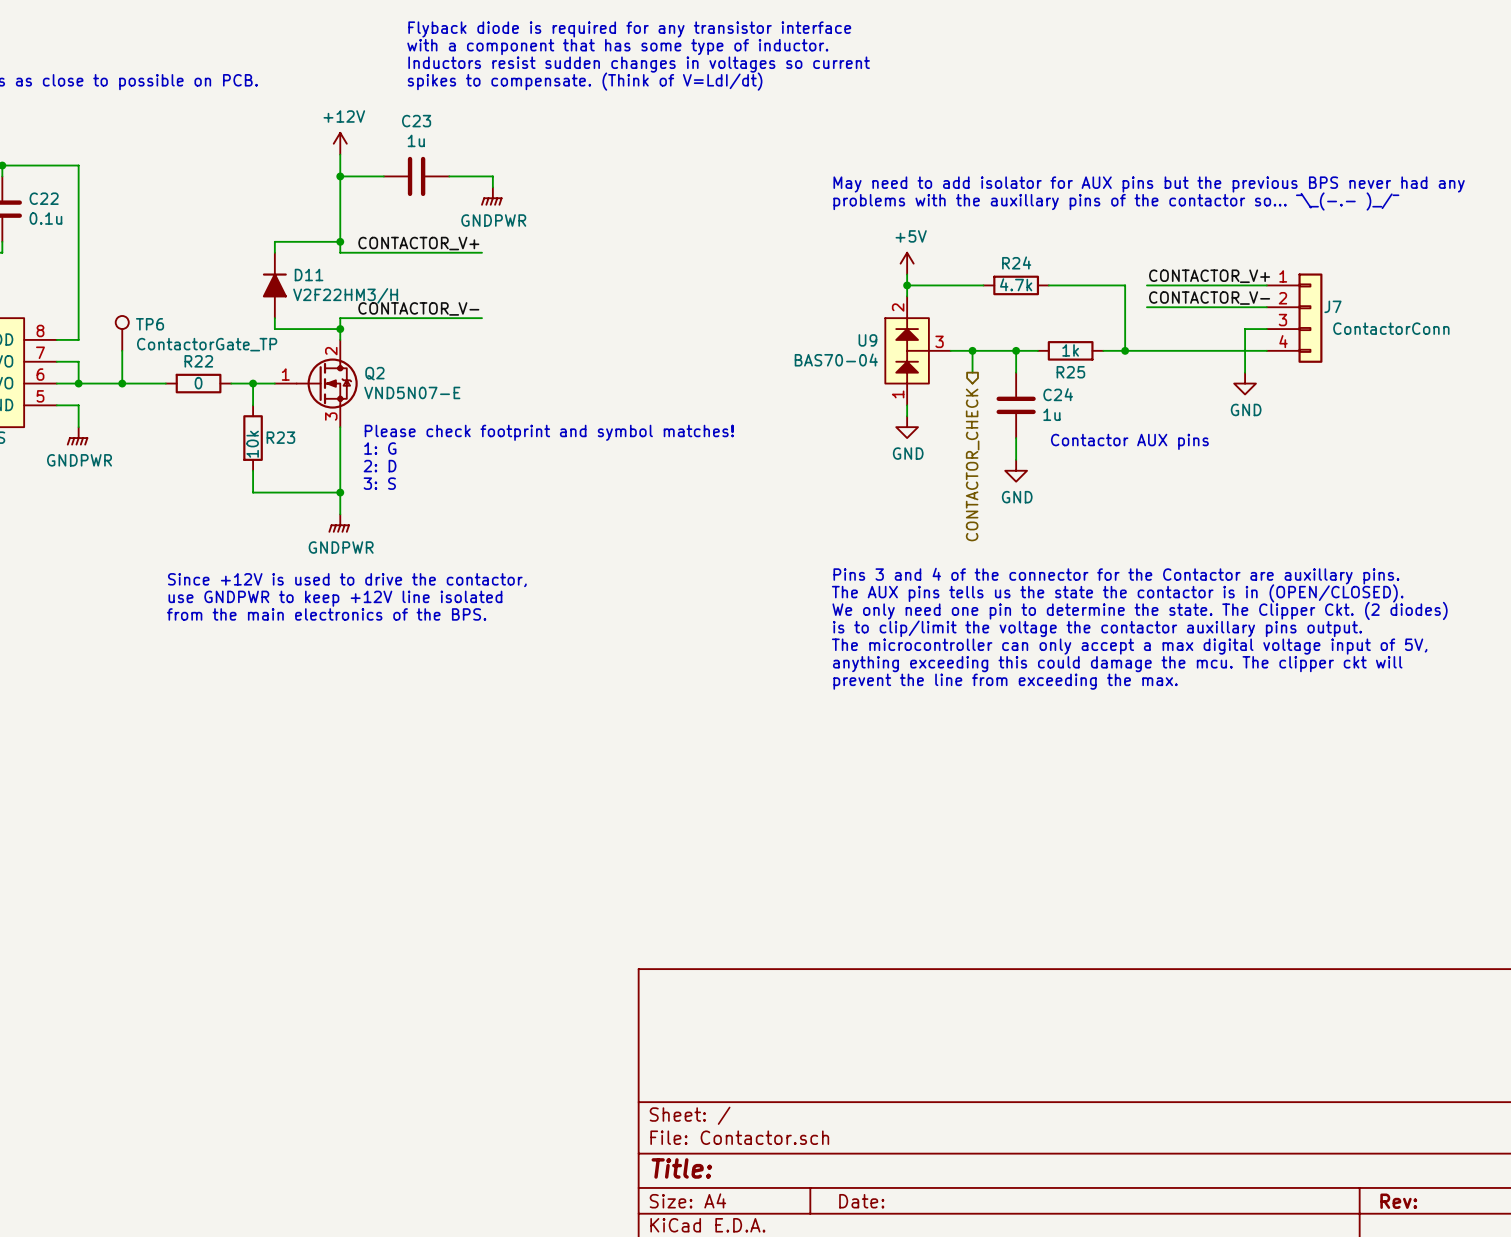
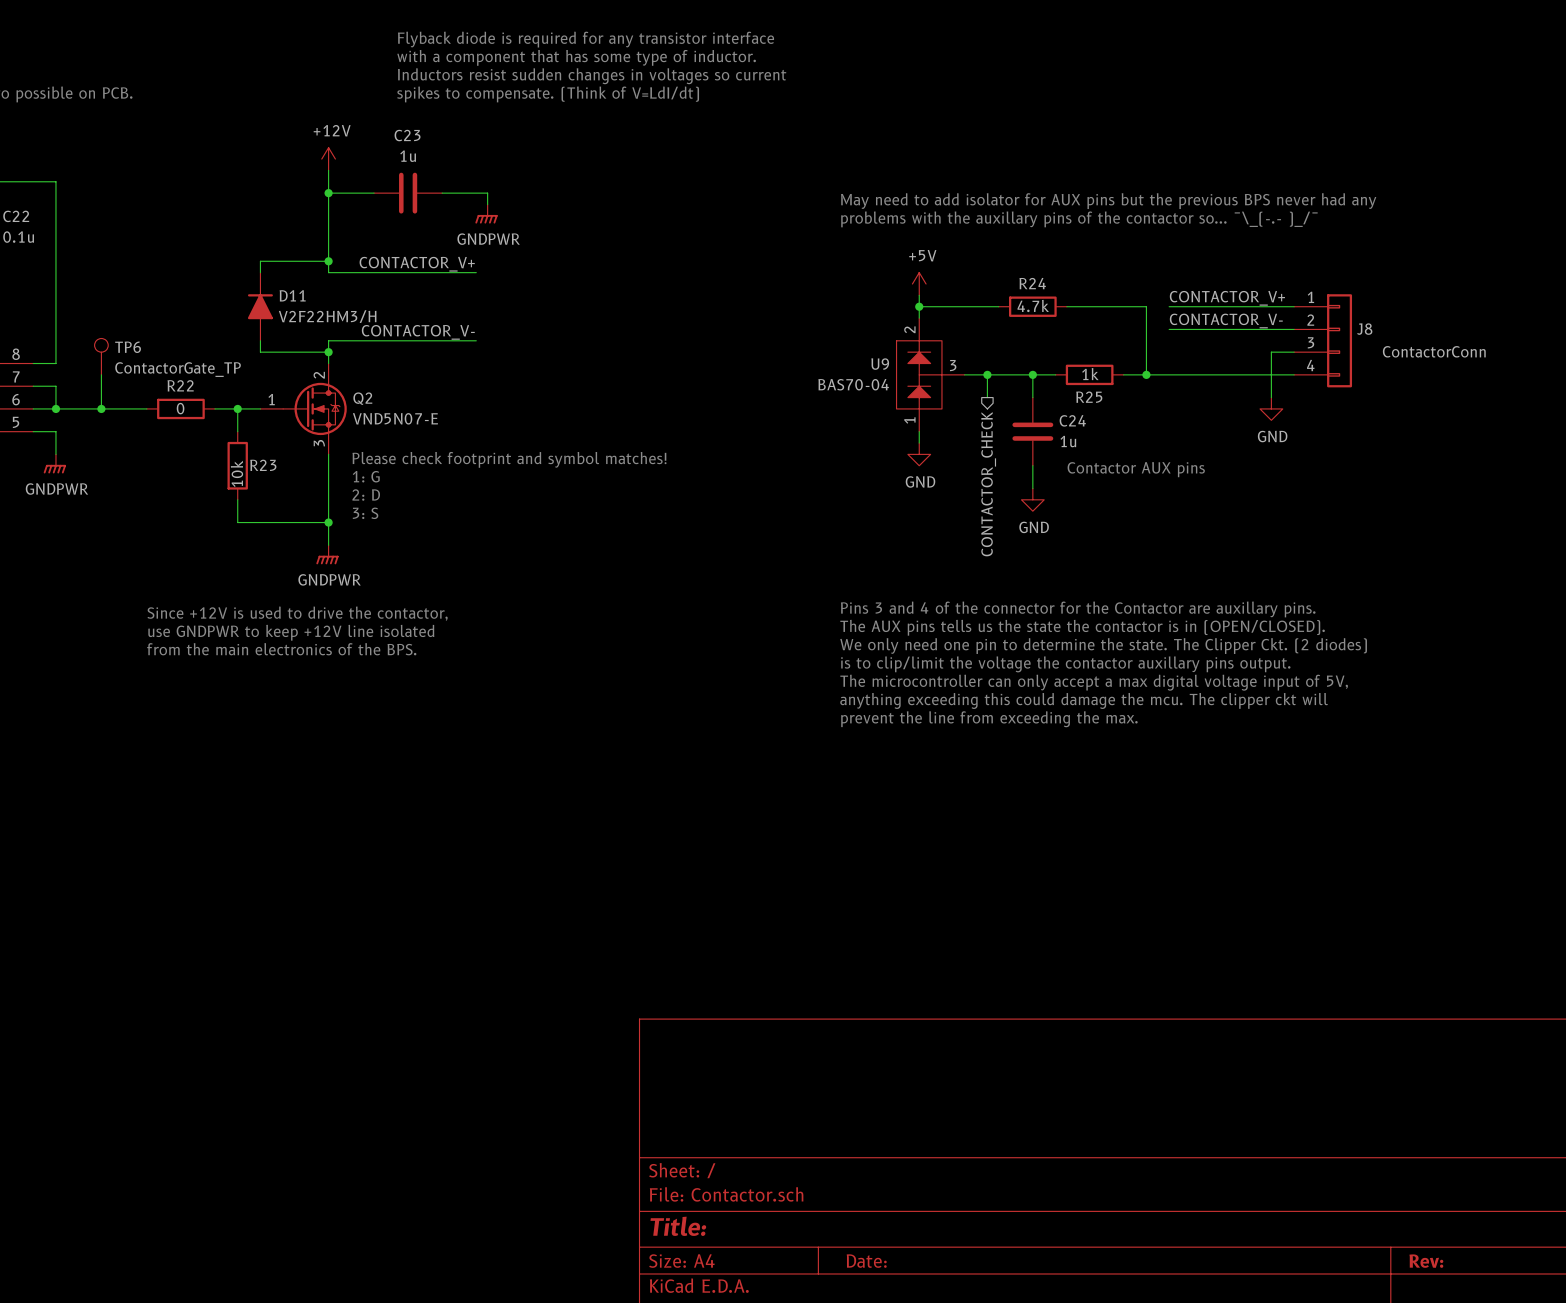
J7 name: J7 (1332, 306) -> J8 (1364, 329)

